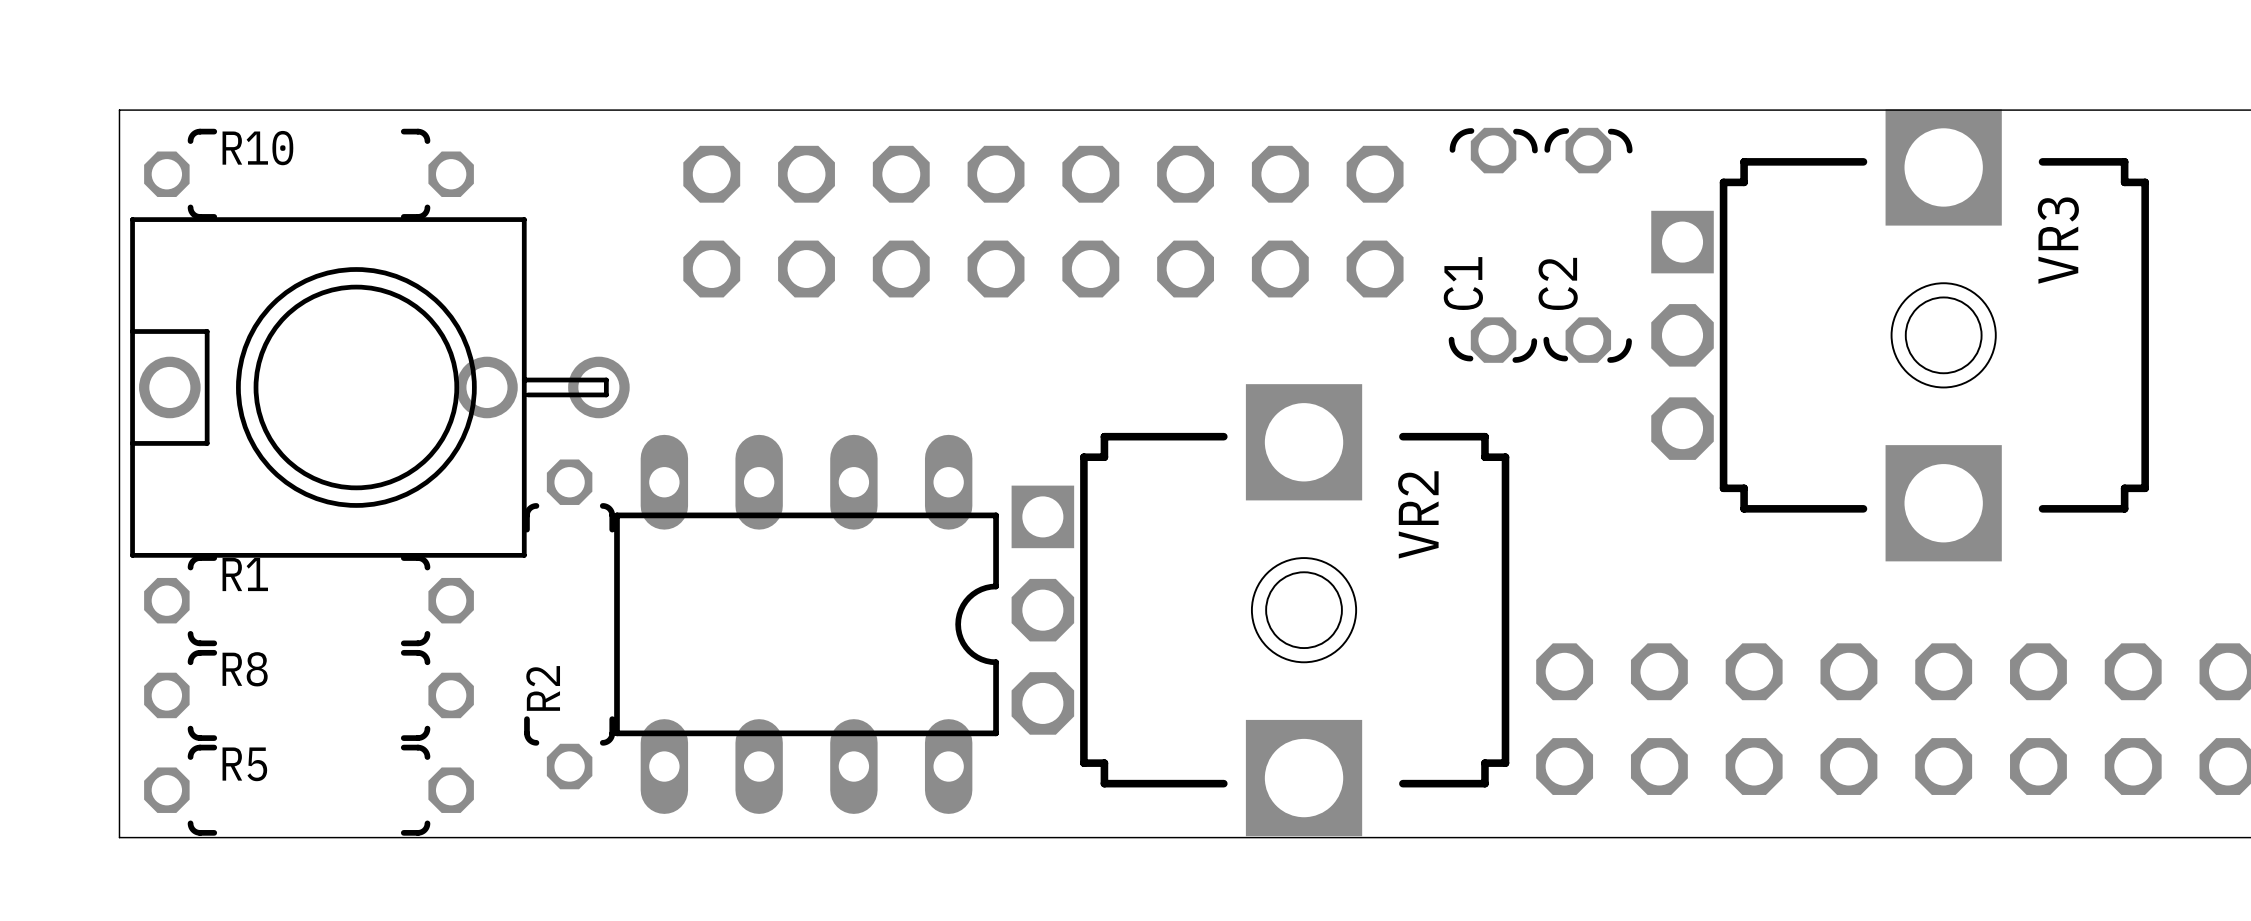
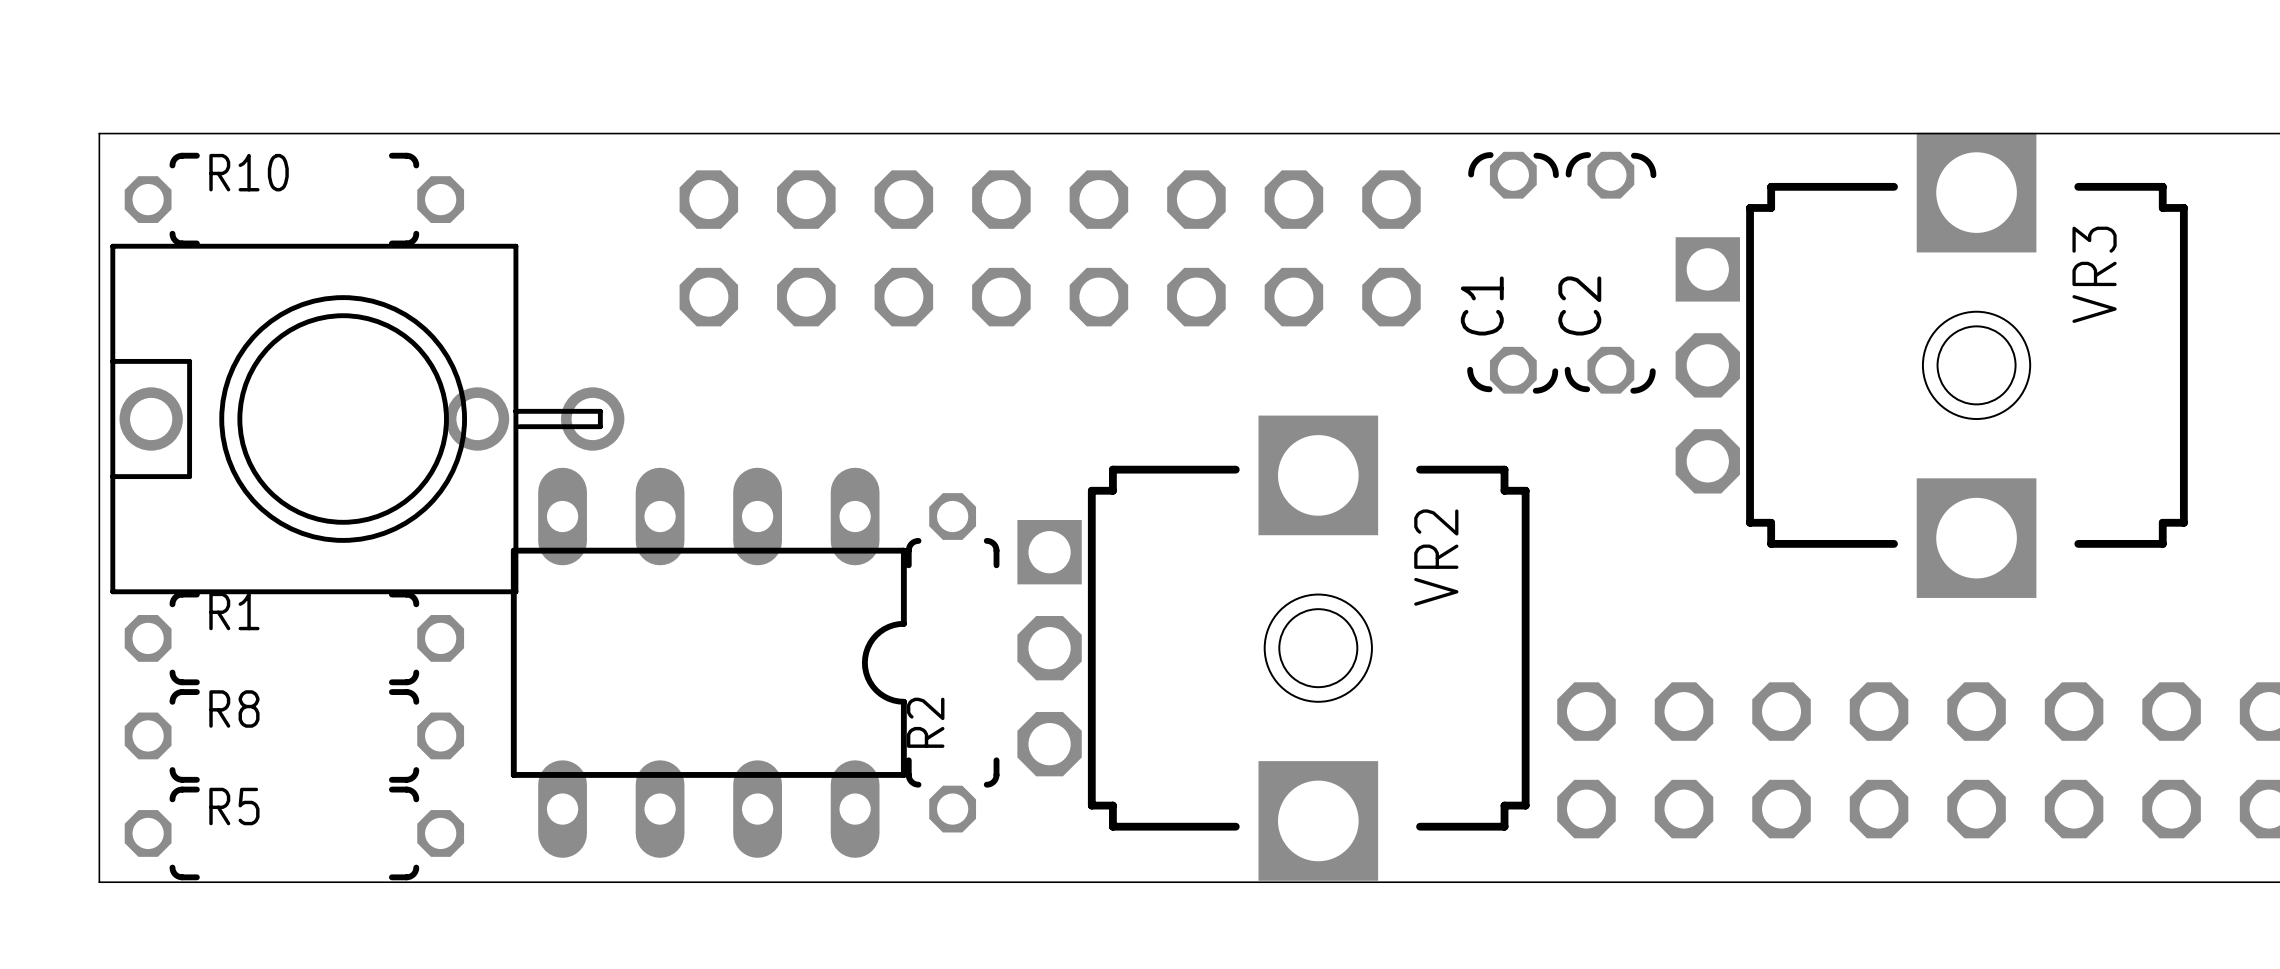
R2 position: (569, 624) -> (952, 662)
part position: (806, 624) -> (708, 662)

